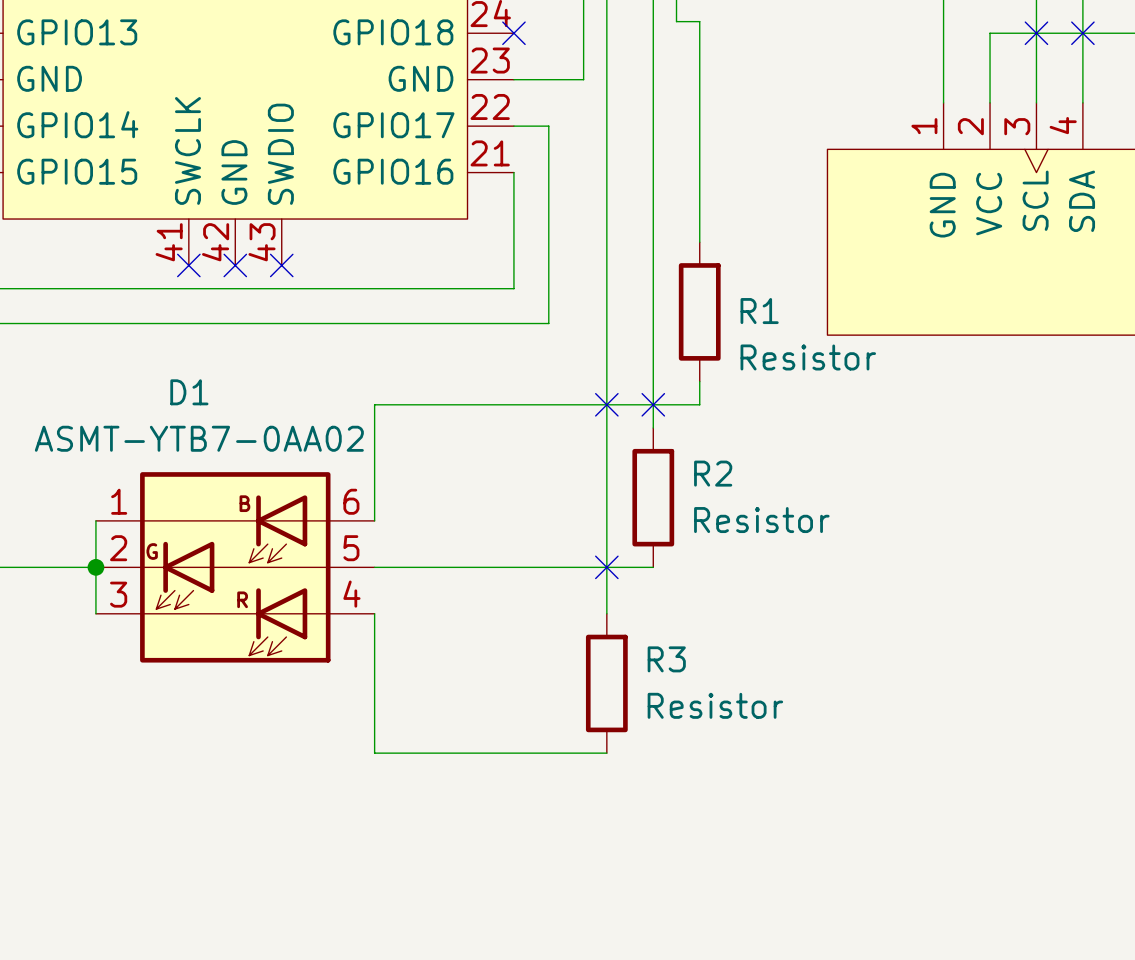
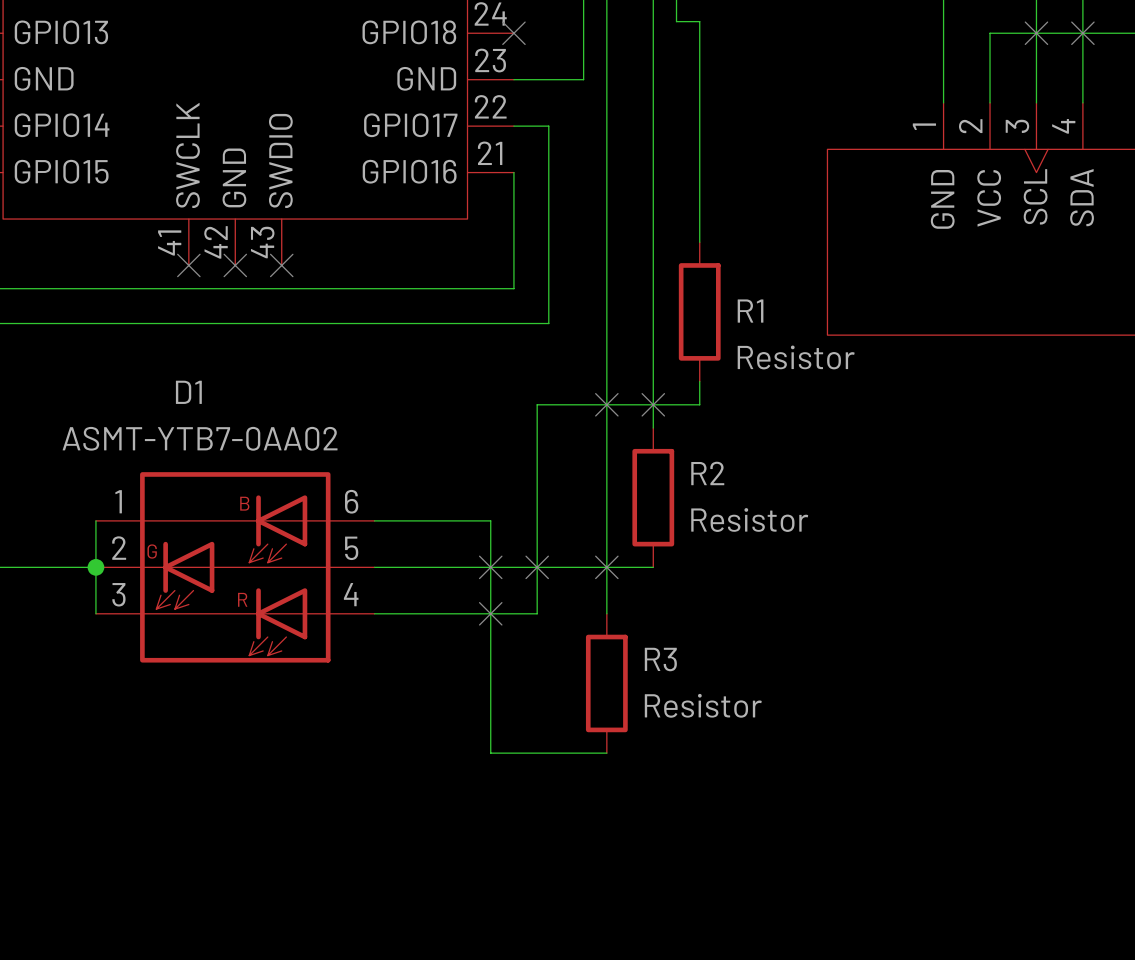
wire: (537, 404) (374, 404) (374, 520) -> (537, 404) (537, 613) (374, 613)
no-connect mark: none -> (490, 567)
no-connect mark: none -> (537, 567)
wire: (374, 613) (374, 753) (490, 753) -> (374, 520) (490, 520) (490, 753)
no-connect mark: none -> (490, 613)

